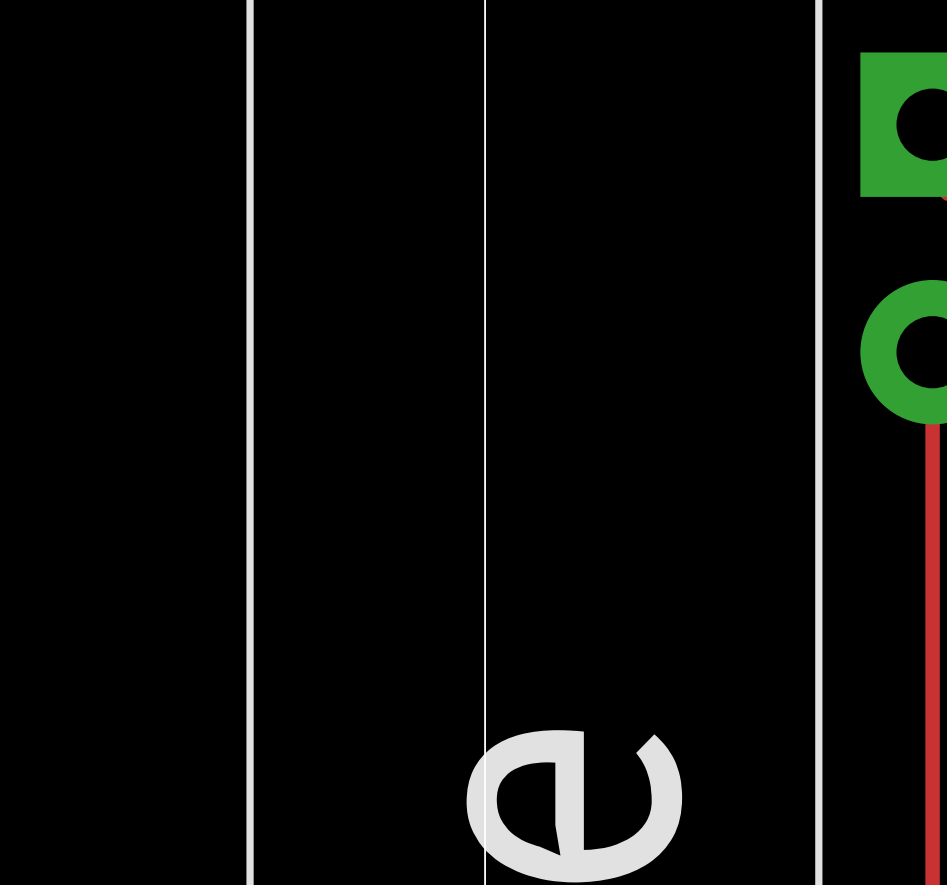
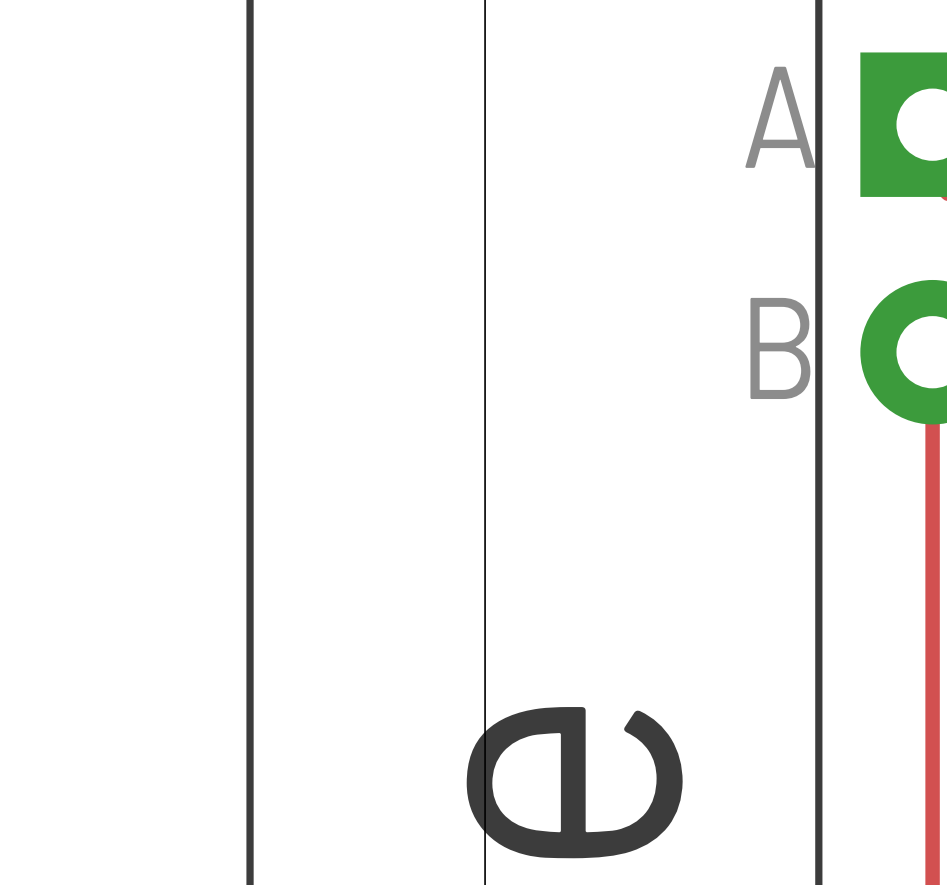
text: none -> A (780, 117)
text: none -> B (780, 348)

